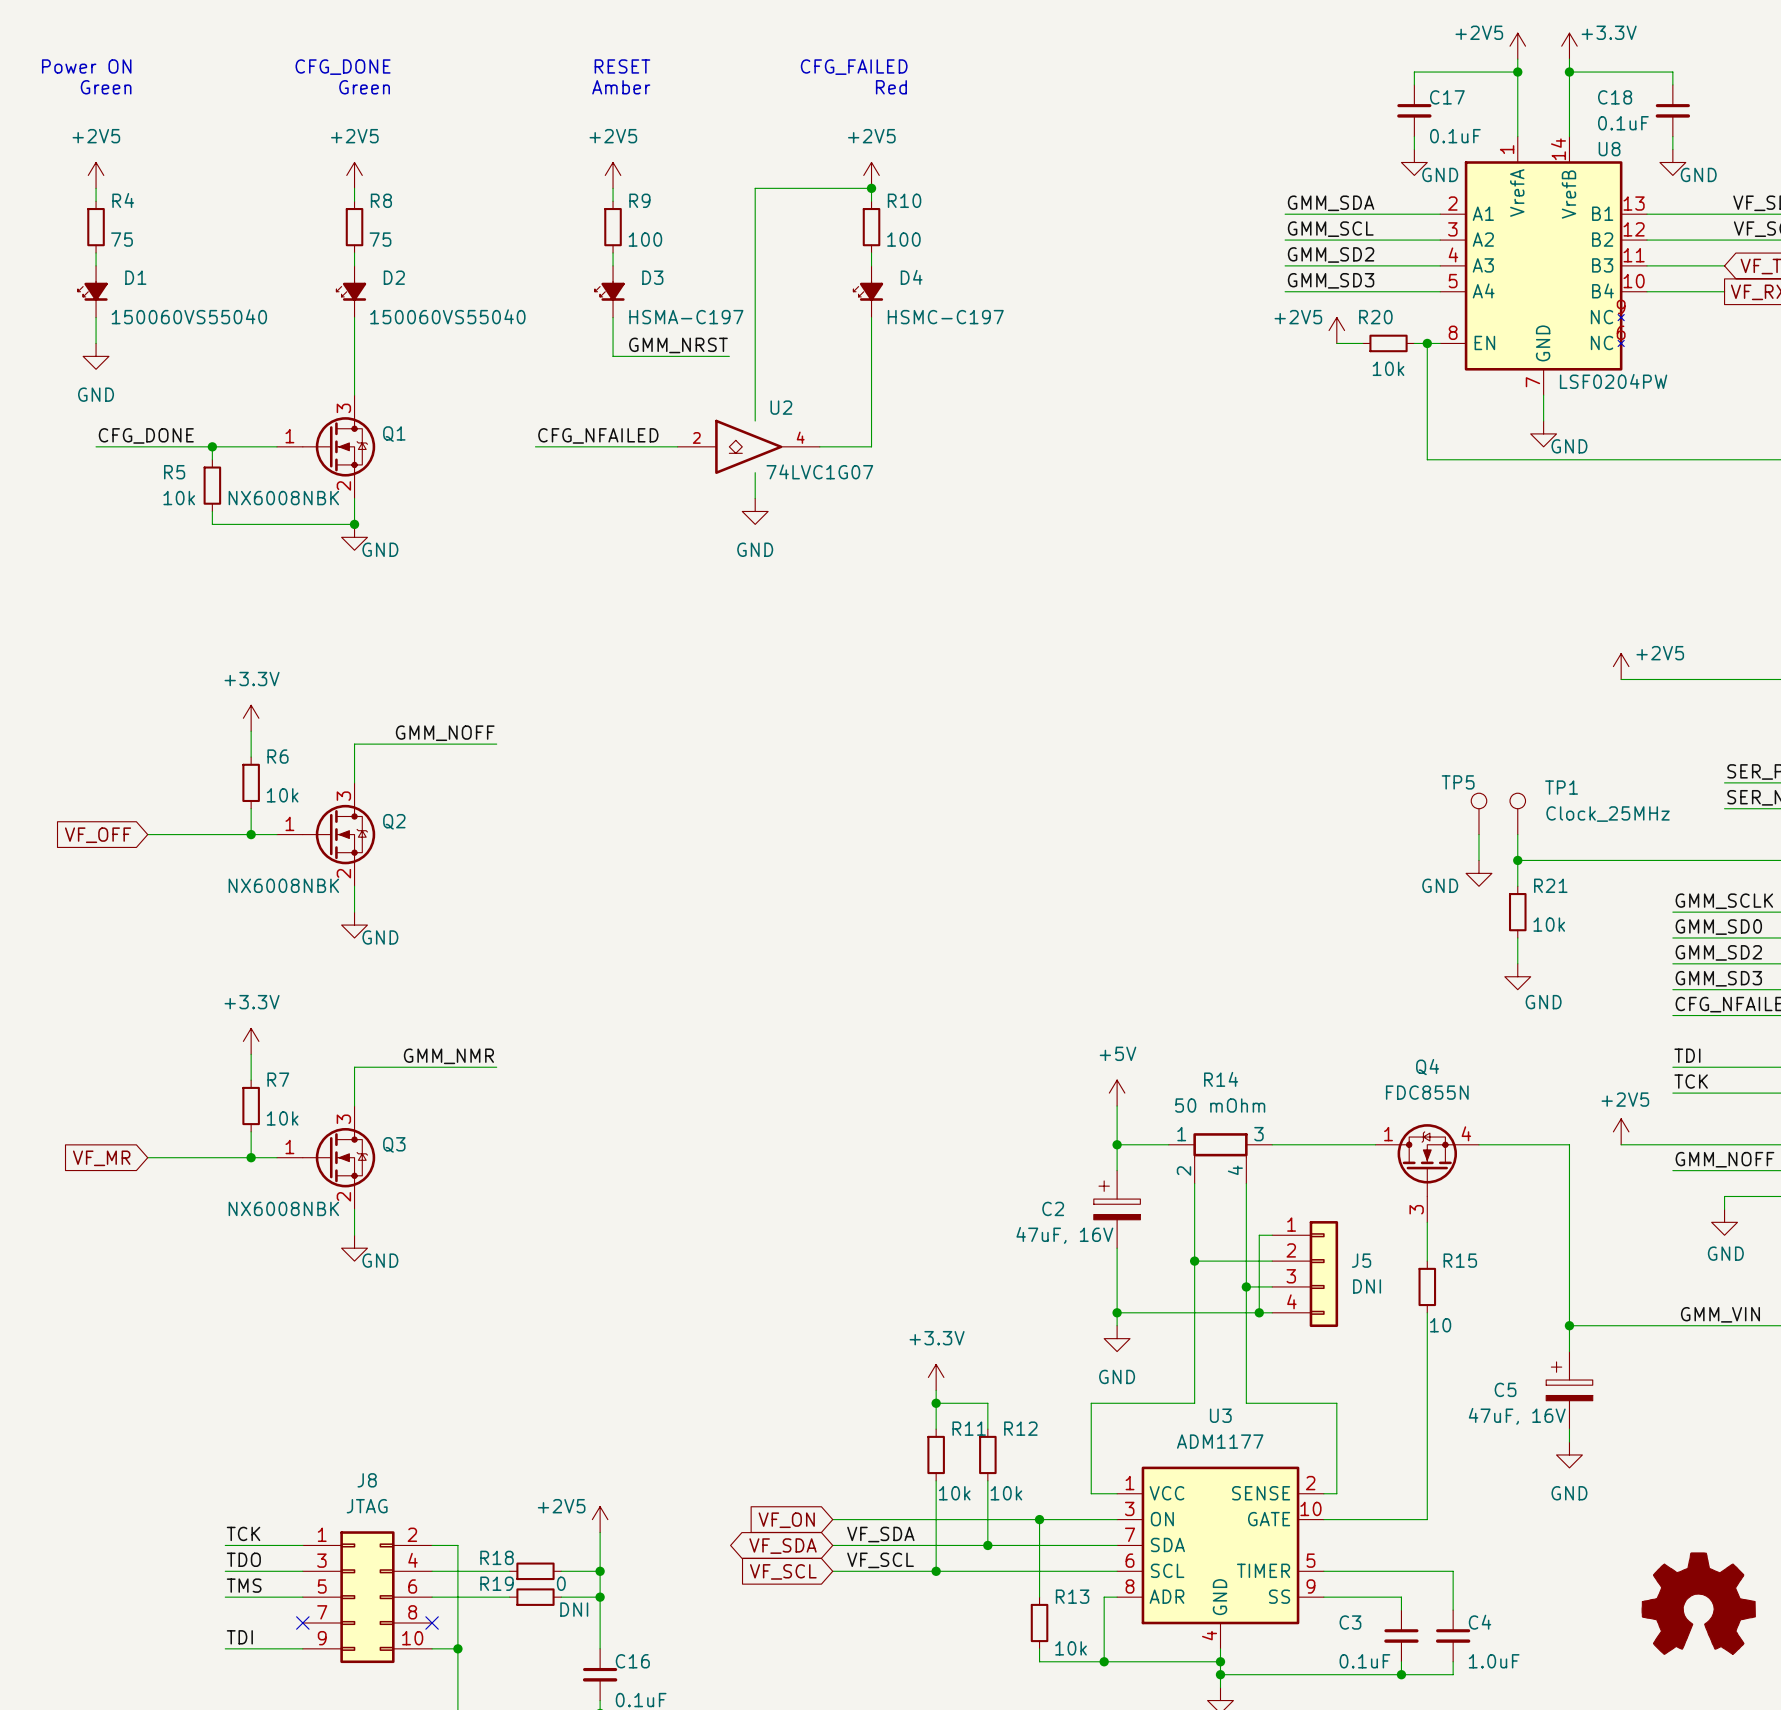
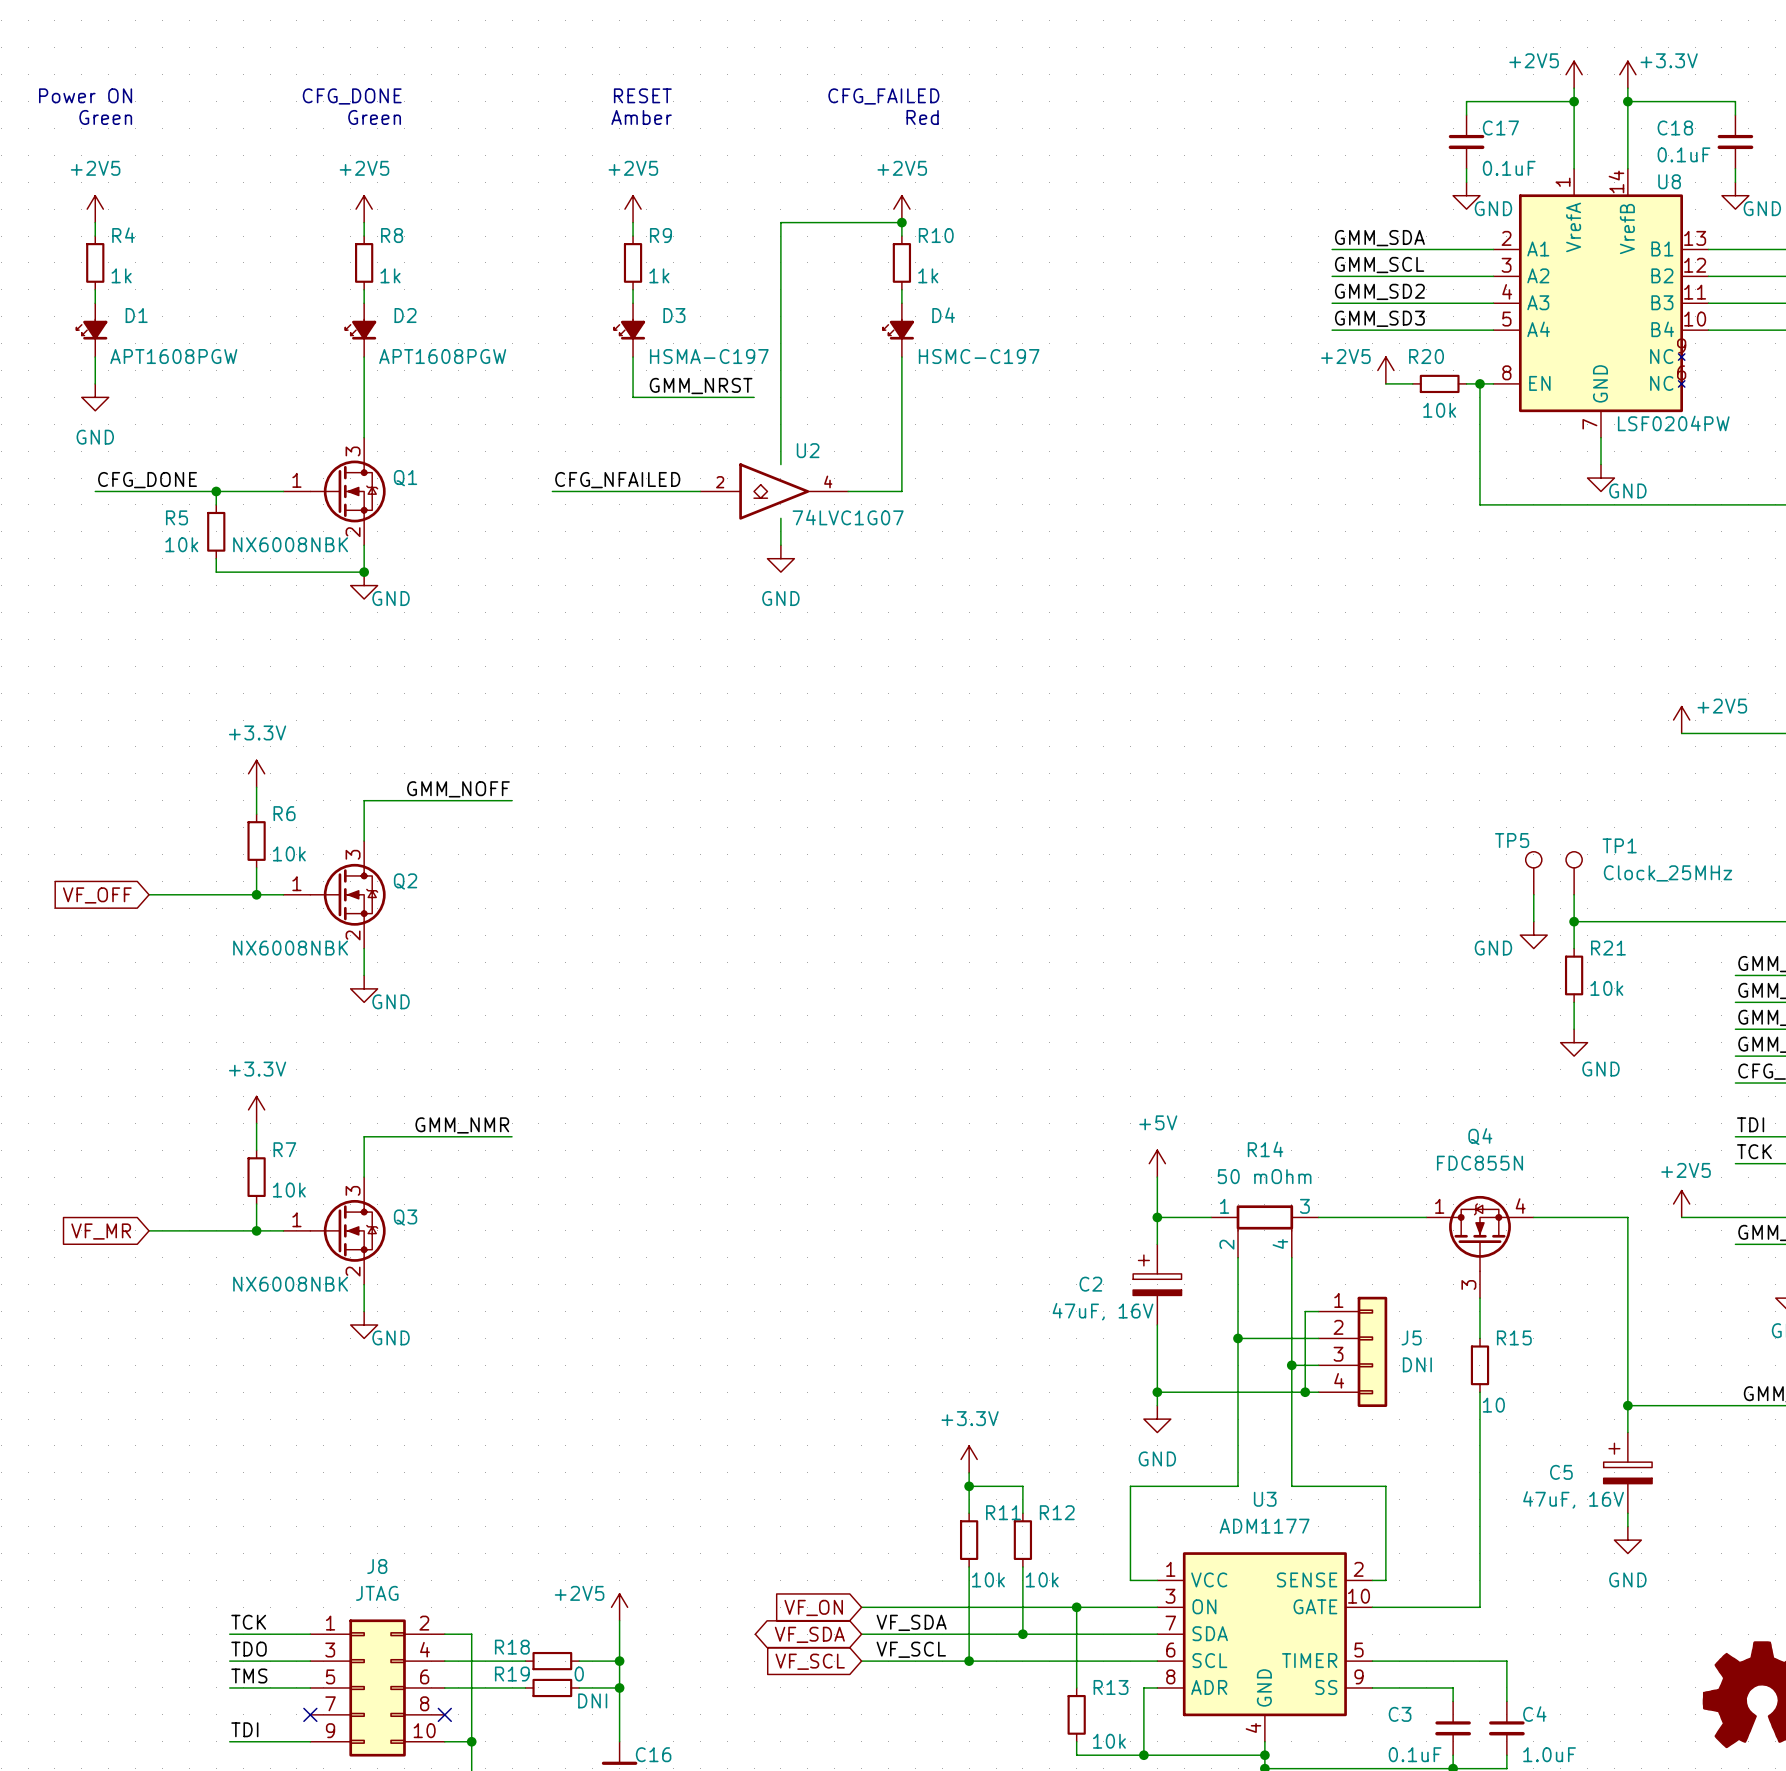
R4 value: 75 (121, 239) -> 1k (121, 275)
R8 value: 75 (380, 239) -> 1k (390, 275)
R9 value: 100 (645, 239) -> 1k (659, 275)
R10 value: 100 (903, 239) -> 1k (928, 275)
D1 value: 150060VS55040 (189, 316) -> APT1608PGW (173, 356)
D2 value: 150060VS55040 (447, 316) -> APT1608PGW (442, 356)

